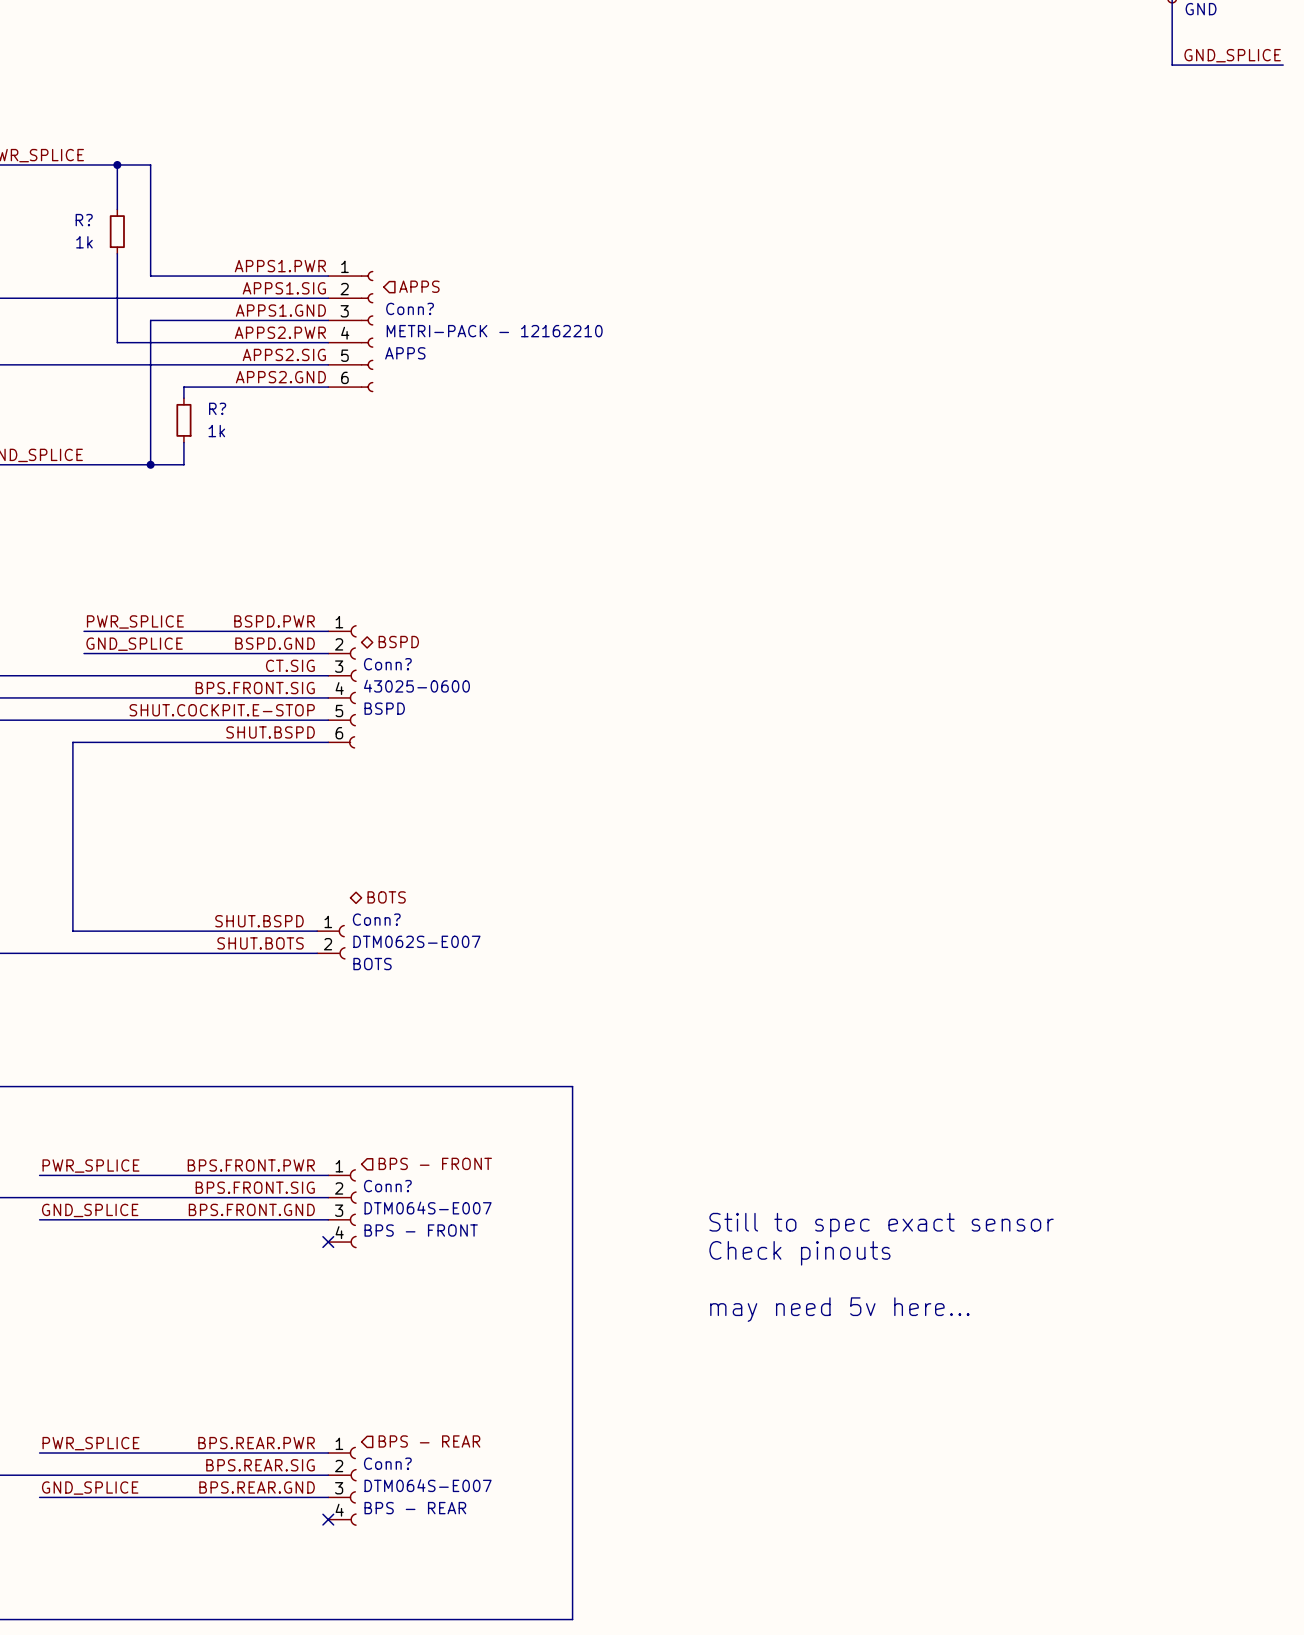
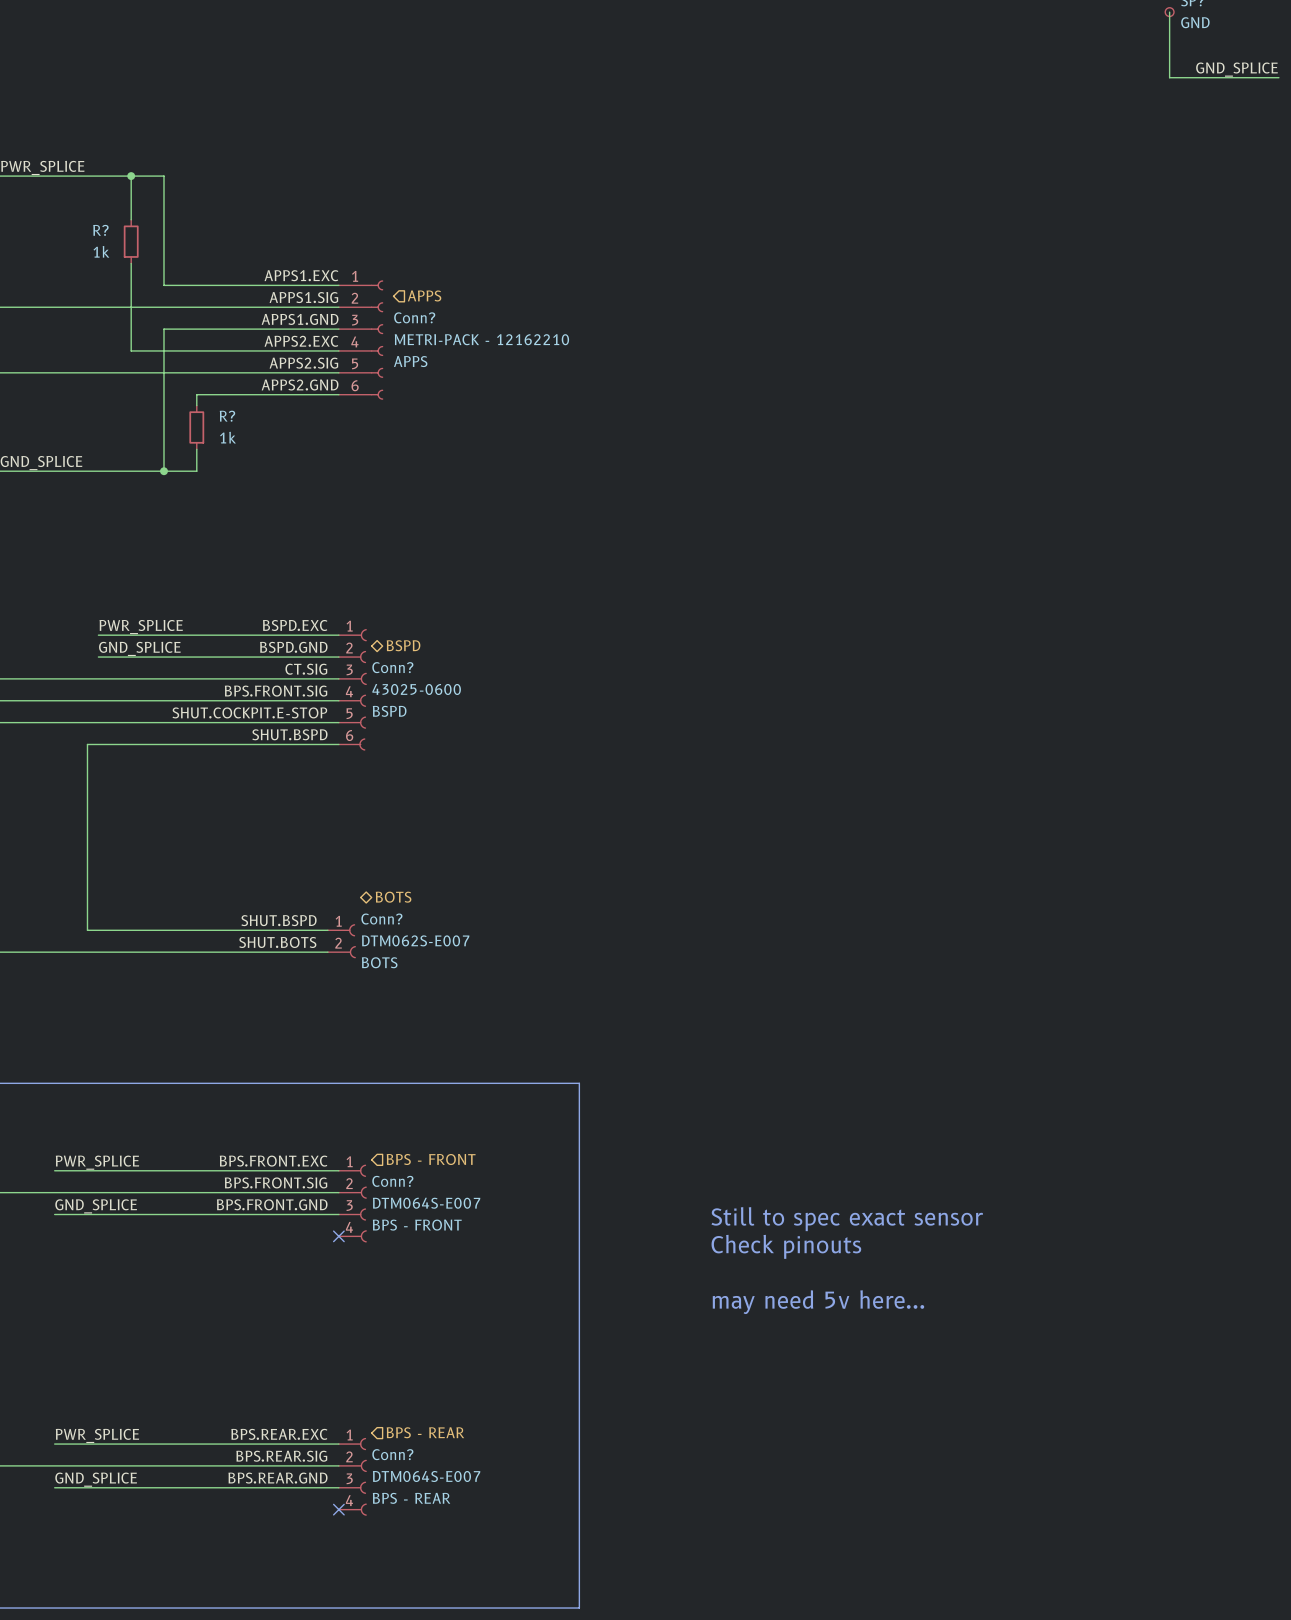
label: APPS1.PWR (280, 266) -> APPS1.EXC (301, 275)
label: APPS2.PWR (280, 332) -> APPS2.EXC (301, 341)
label: BSPD.PWR (274, 621) -> BSPD.EXC (295, 625)
label: BPS.FRONT.PWR (251, 1165) -> BPS.FRONT.EXC (273, 1161)
label: BPS.REAR.PWR (256, 1443) -> BPS.REAR.EXC (279, 1434)

